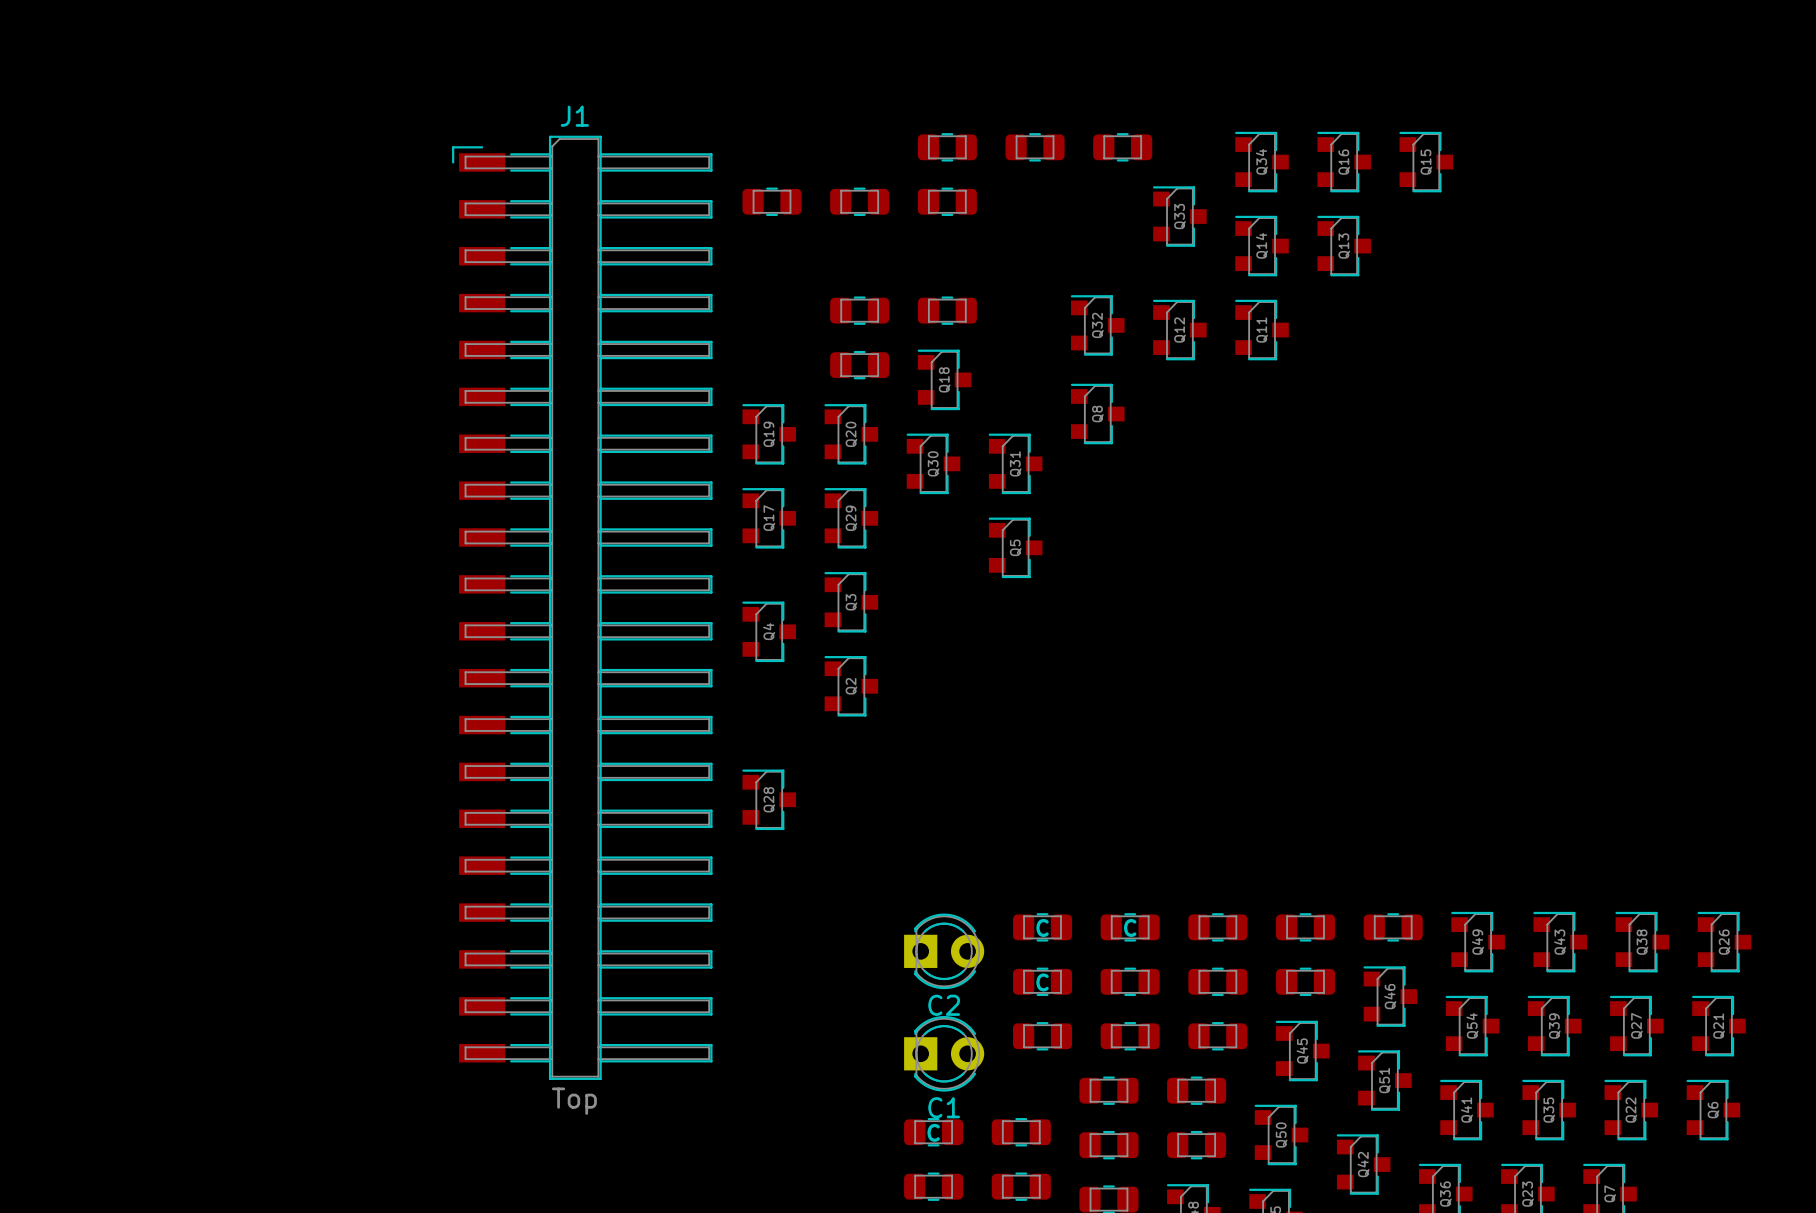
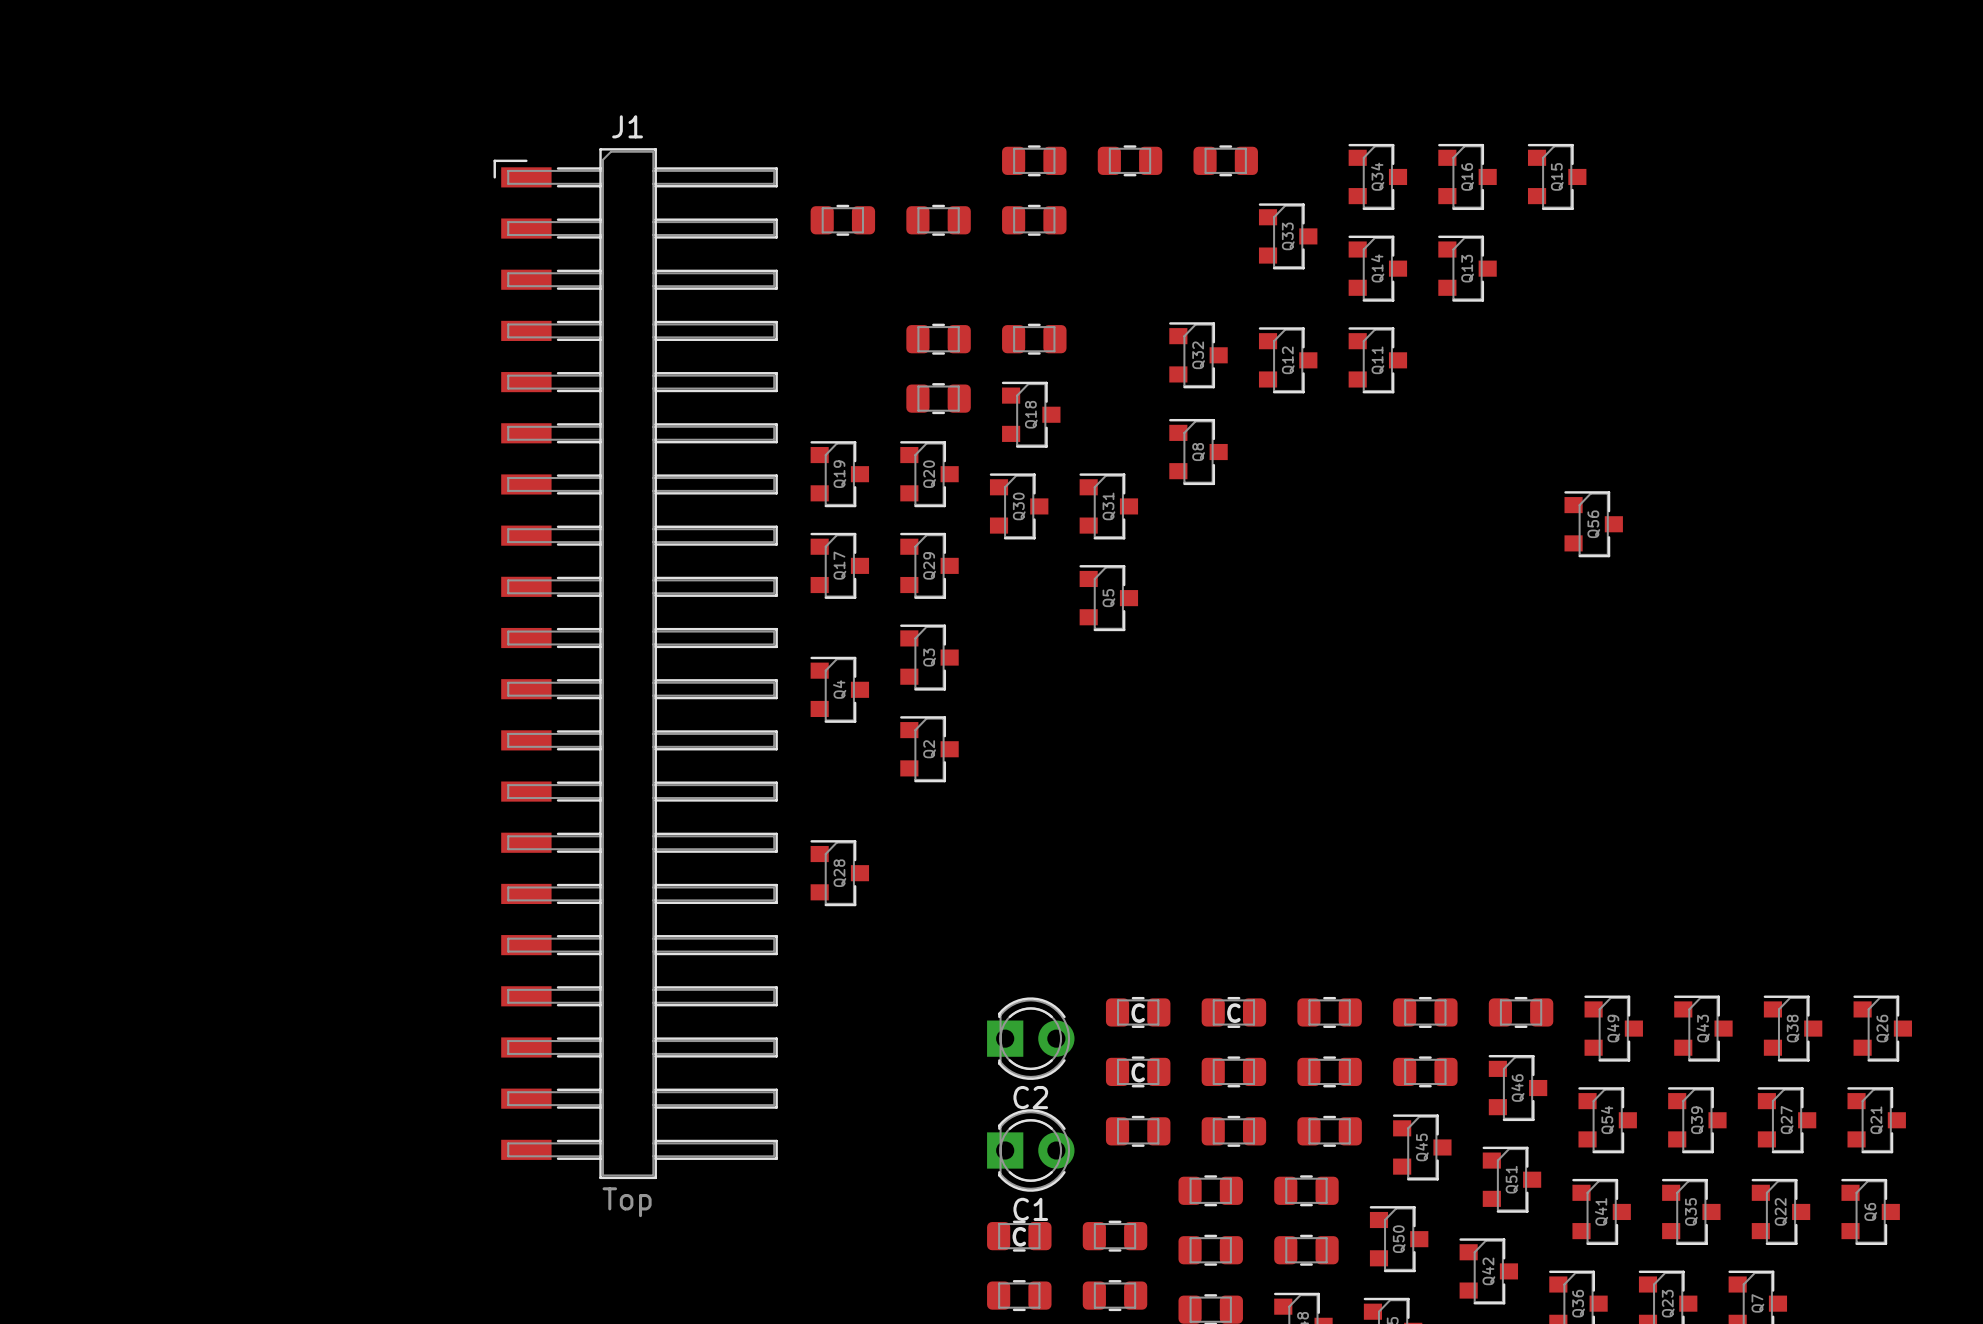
Q56: none -> (1593, 524)

